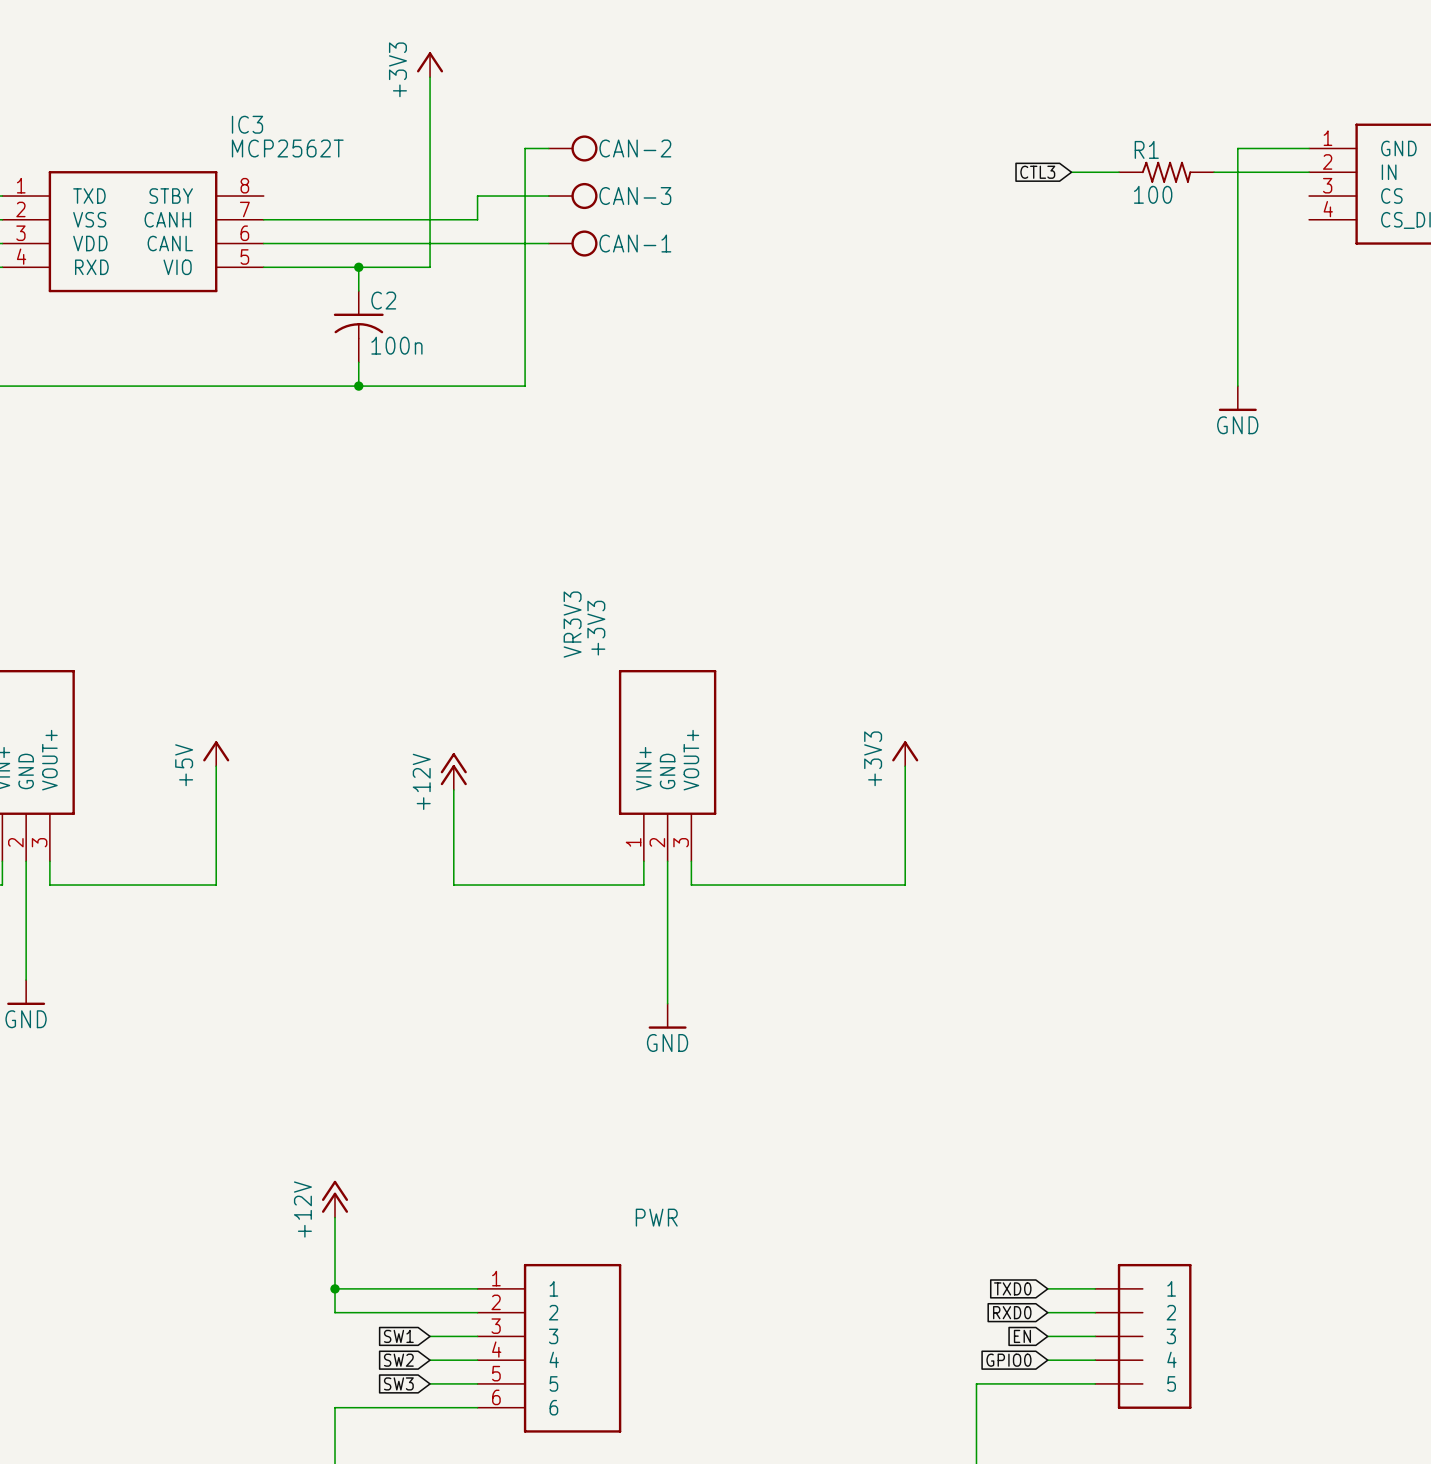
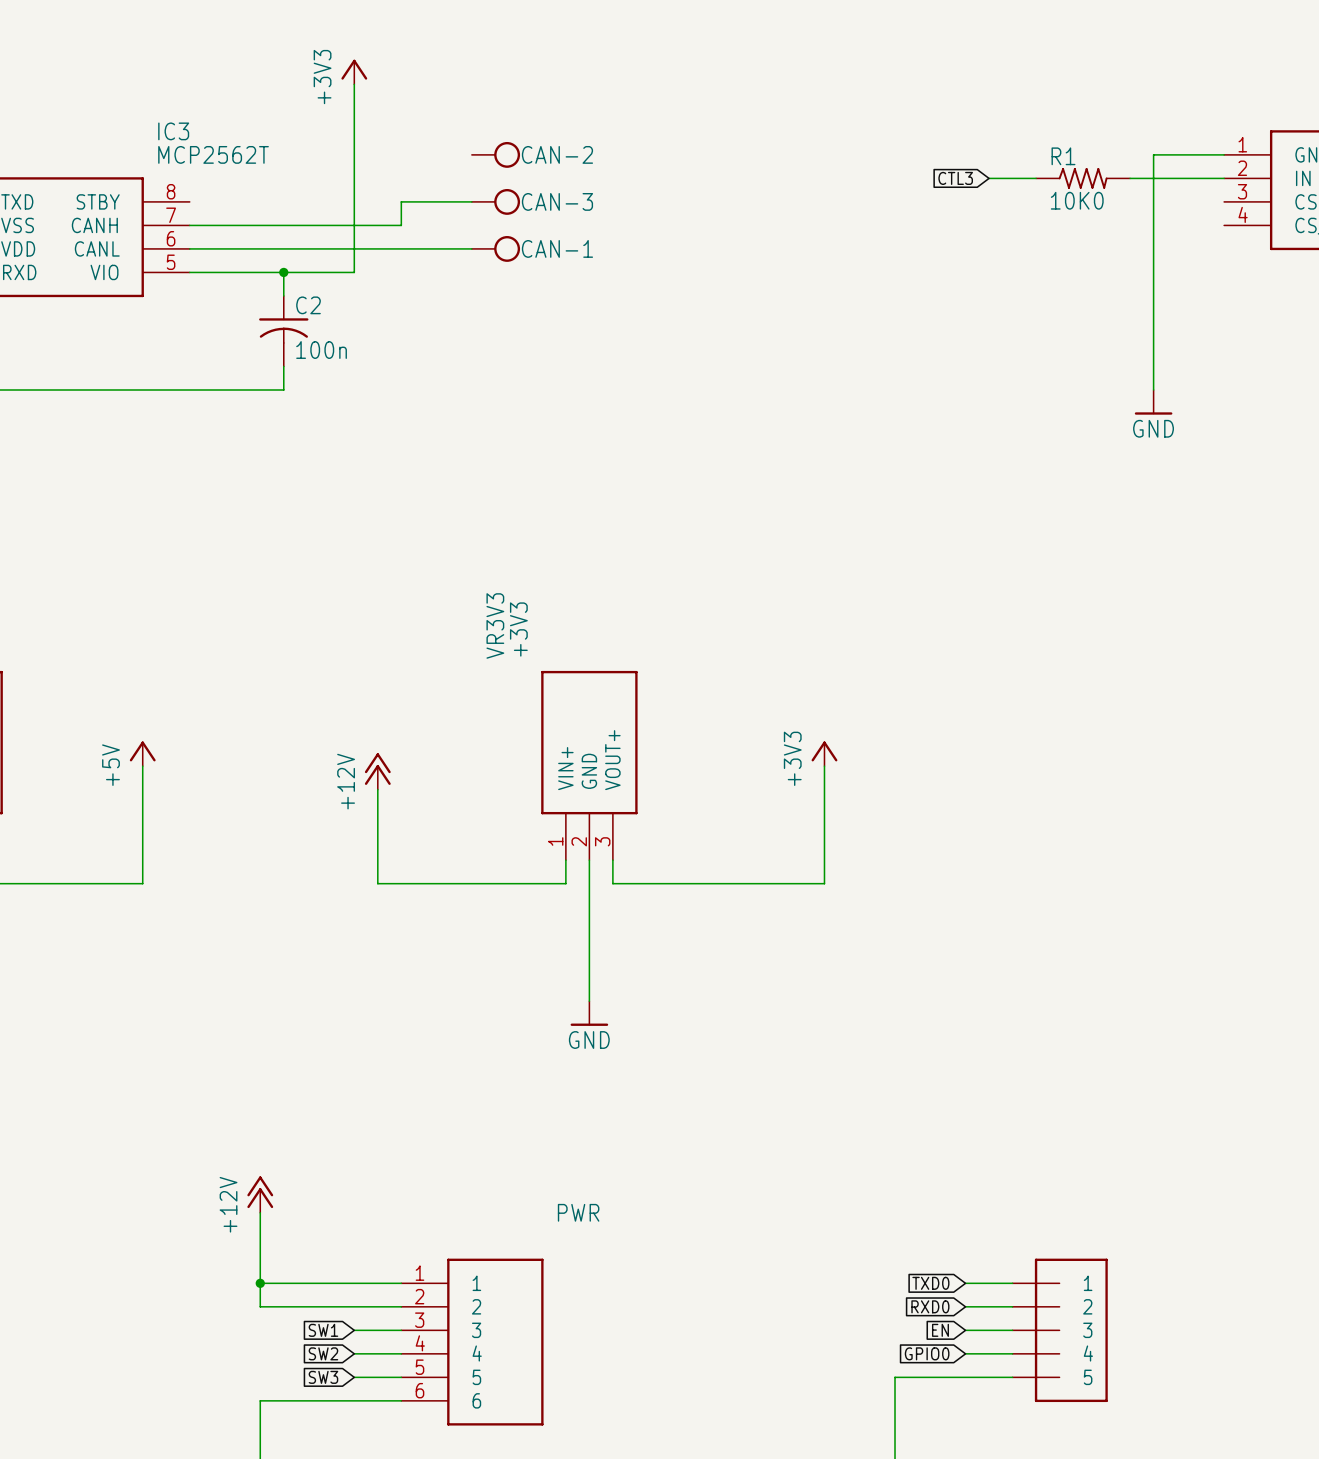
wire: (548, 148) (525, 148) (525, 386) (358, 386) -> none
R1 value: 100 (1153, 194) -> 10K0 (1077, 200)
junction: (358, 386) -> none

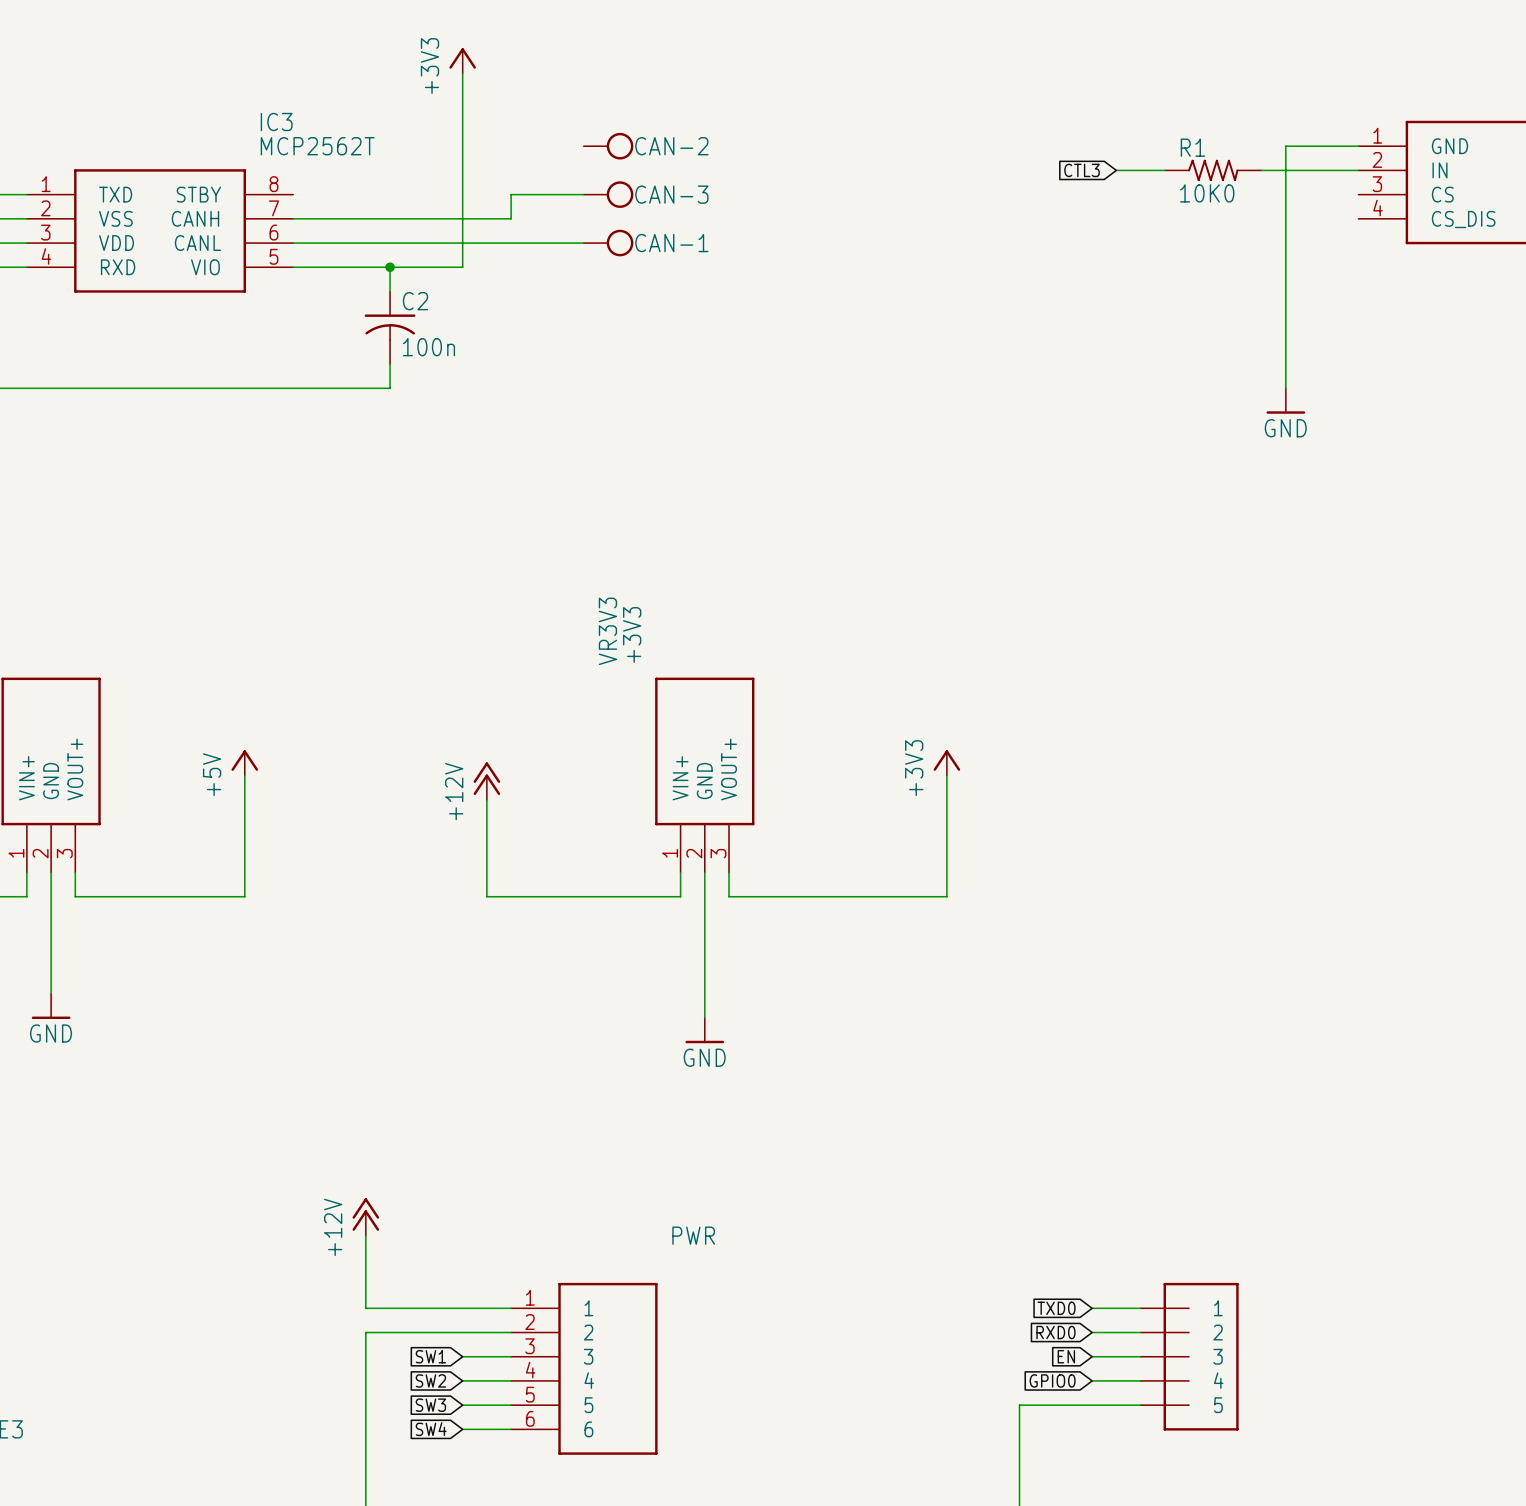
wire: (260, 1283) (260, 1306) -> (365, 1429) (365, 1332)
junction: (260, 1283) -> none
wire: (260, 1400) (354, 1400) -> none
global label: none -> SW4 (431, 1429)

